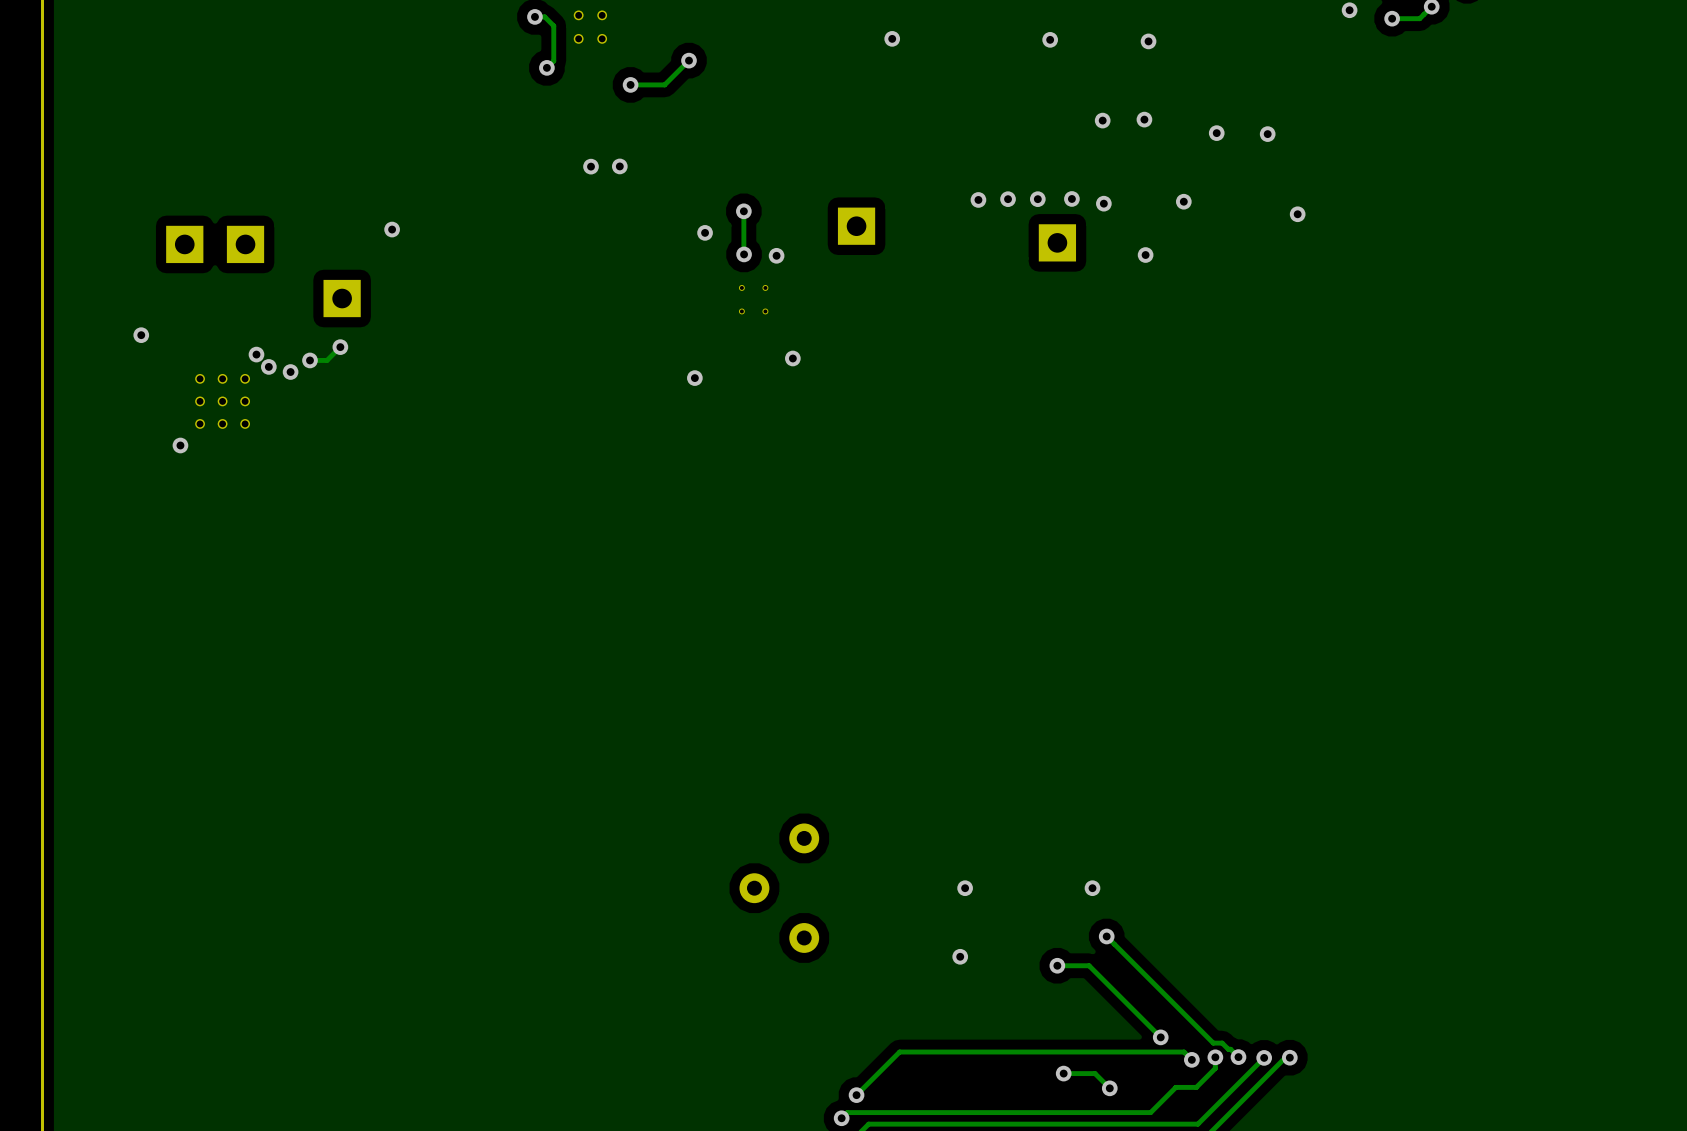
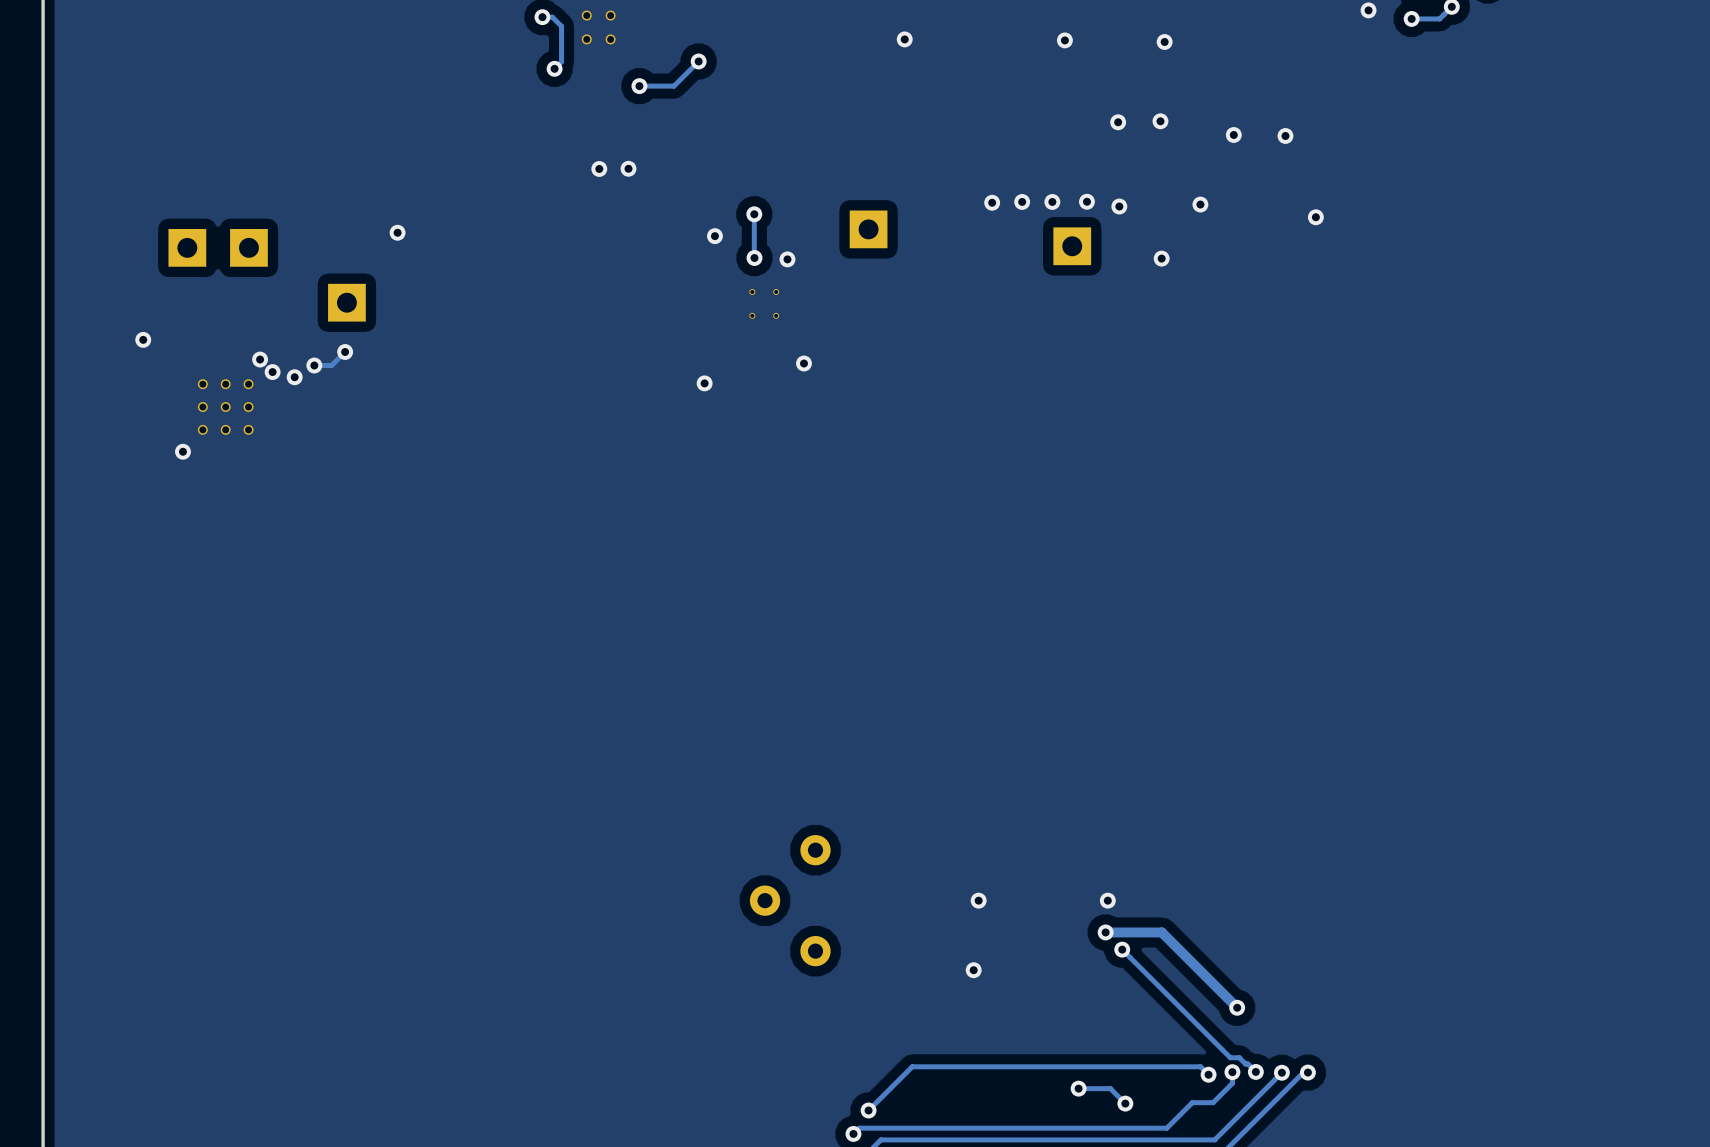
track: none -> (1105, 932) (1161, 932) (1237, 1007)
track: (1057, 965) (1089, 965) (1160, 1037) -> none
via position: (1057, 965) -> (1105, 932)
via: none -> (1237, 1007)
via: (1160, 1037) -> none

